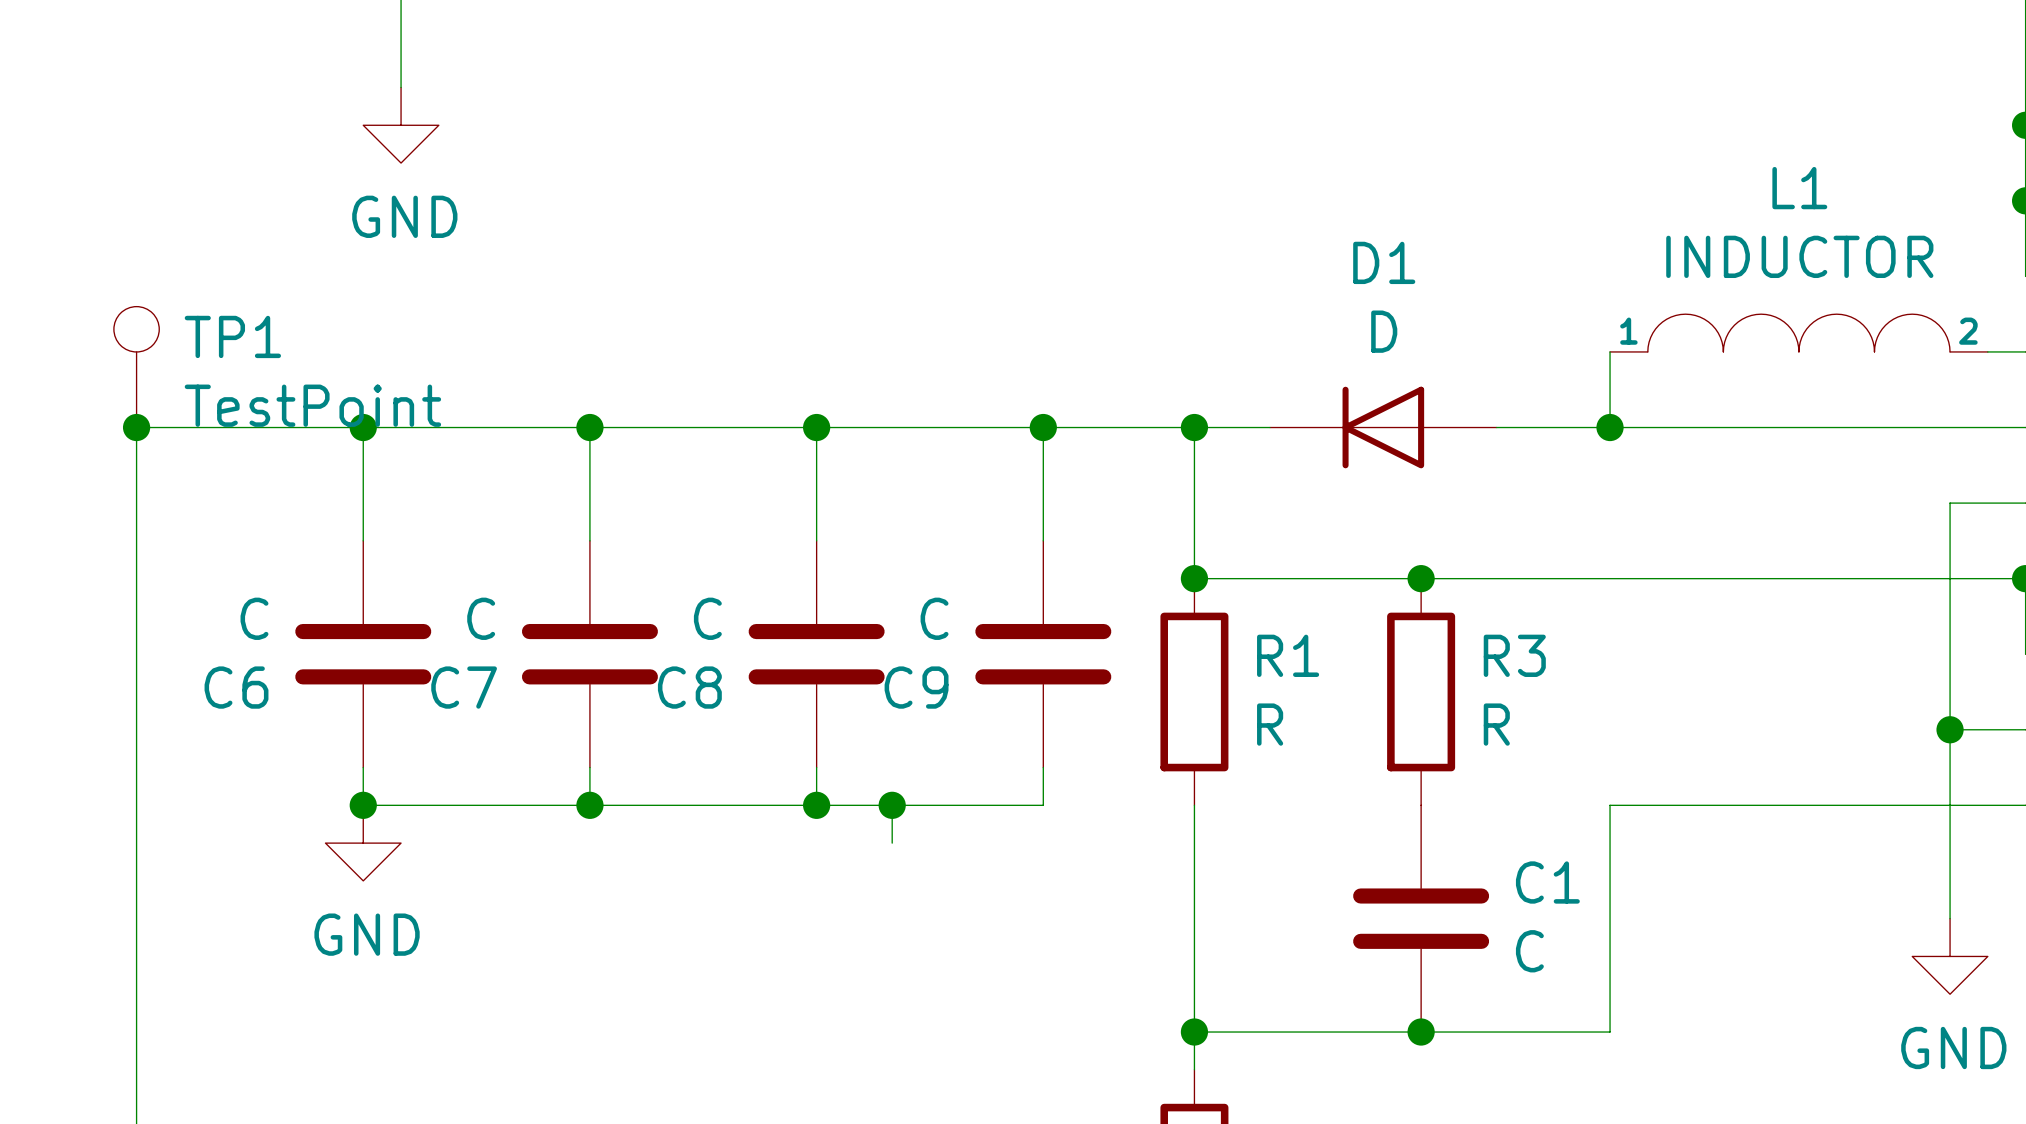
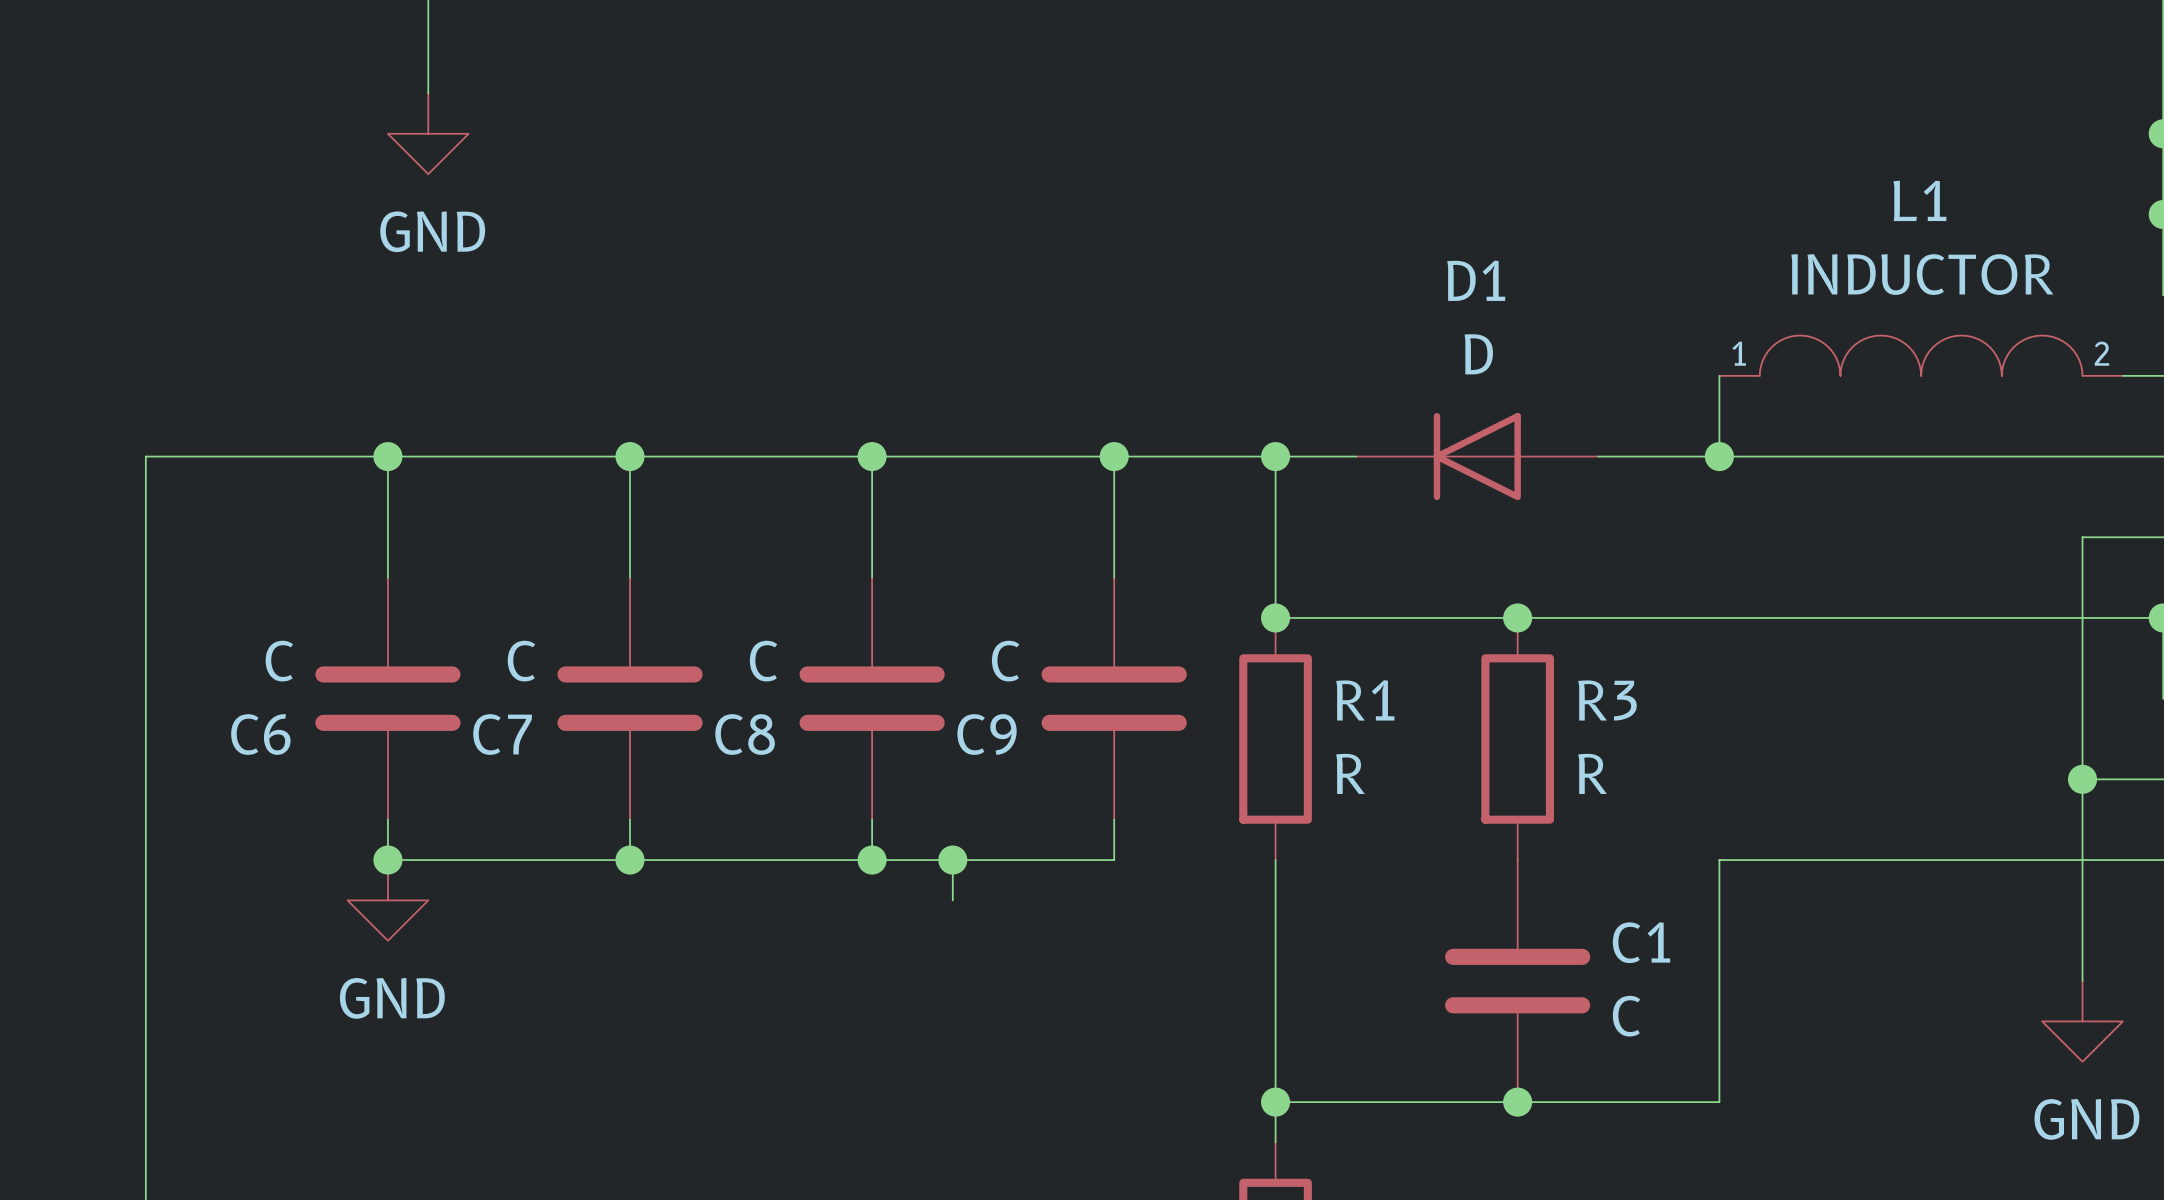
TP1: TestPoint (136, 367) -> none
junction: (136, 427) -> none

